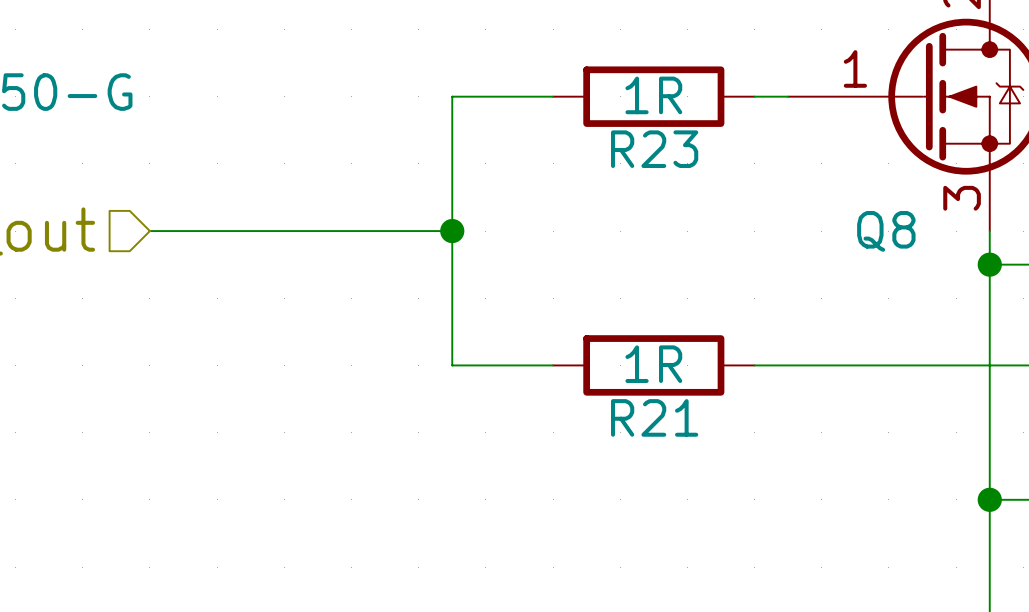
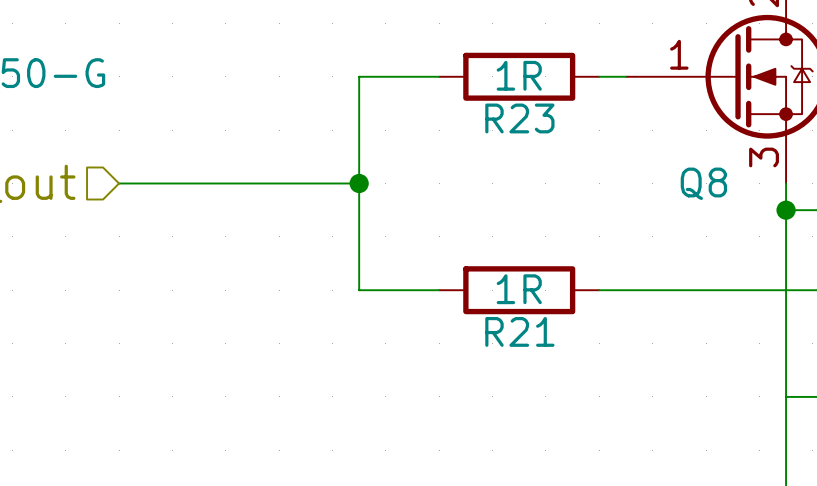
junction: (989, 499) -> none

